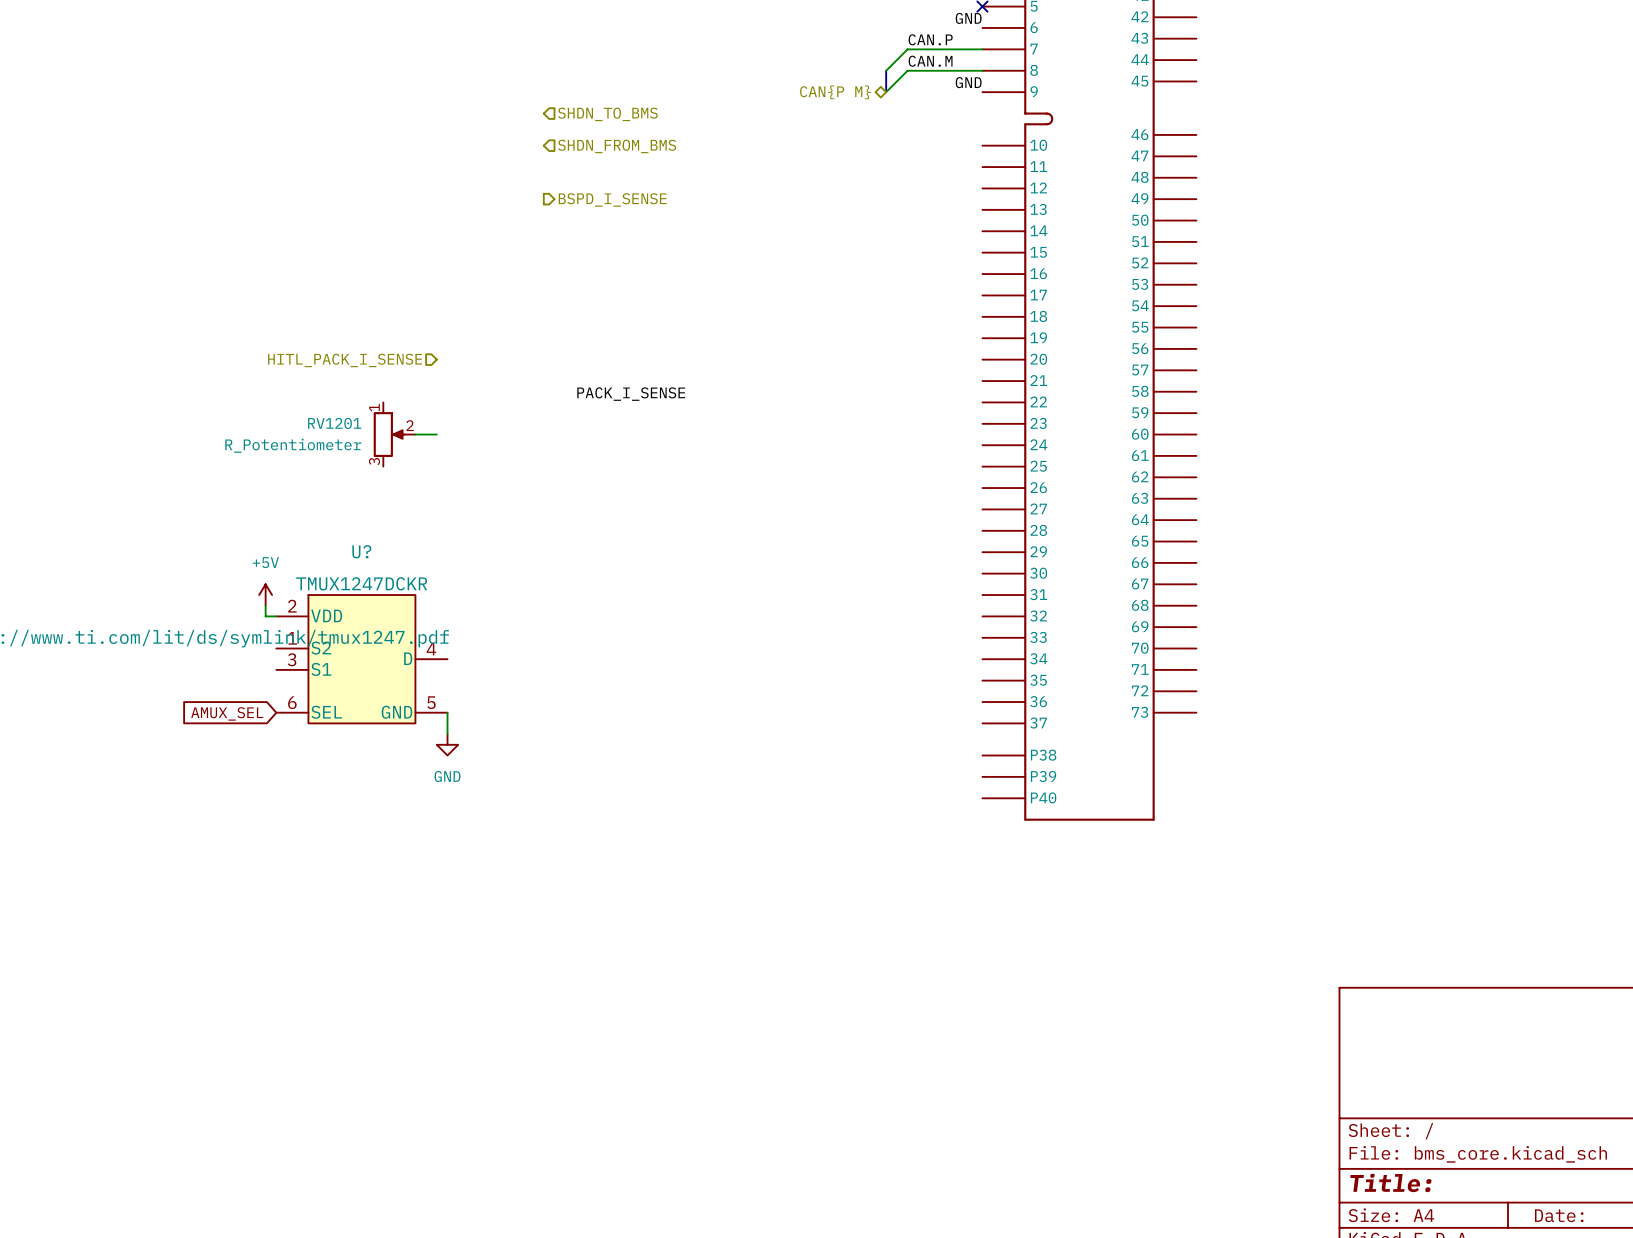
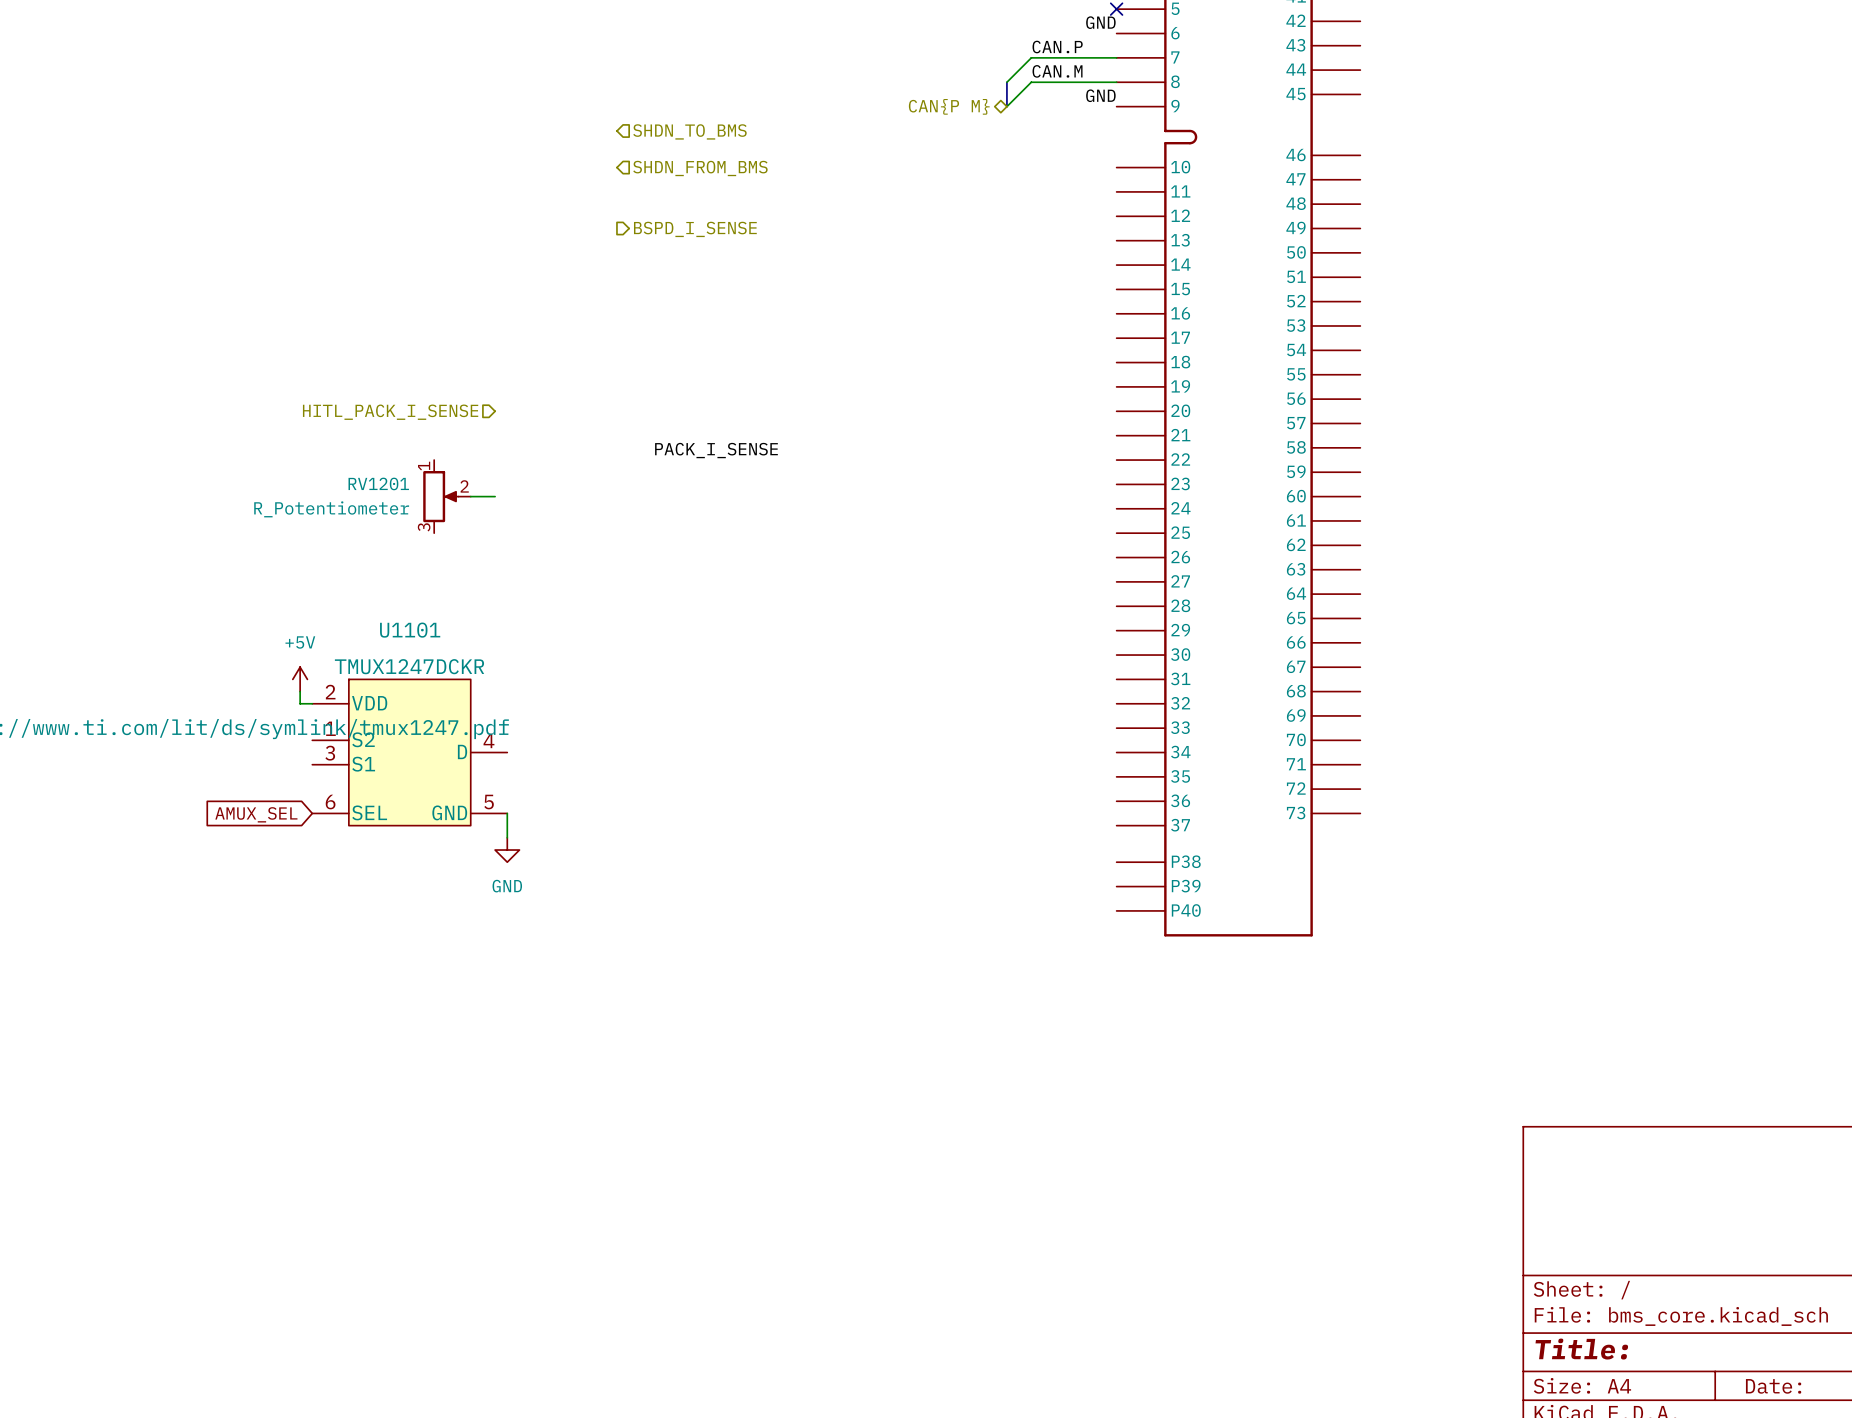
U? name: U? (361, 551) -> U1101 (410, 630)

